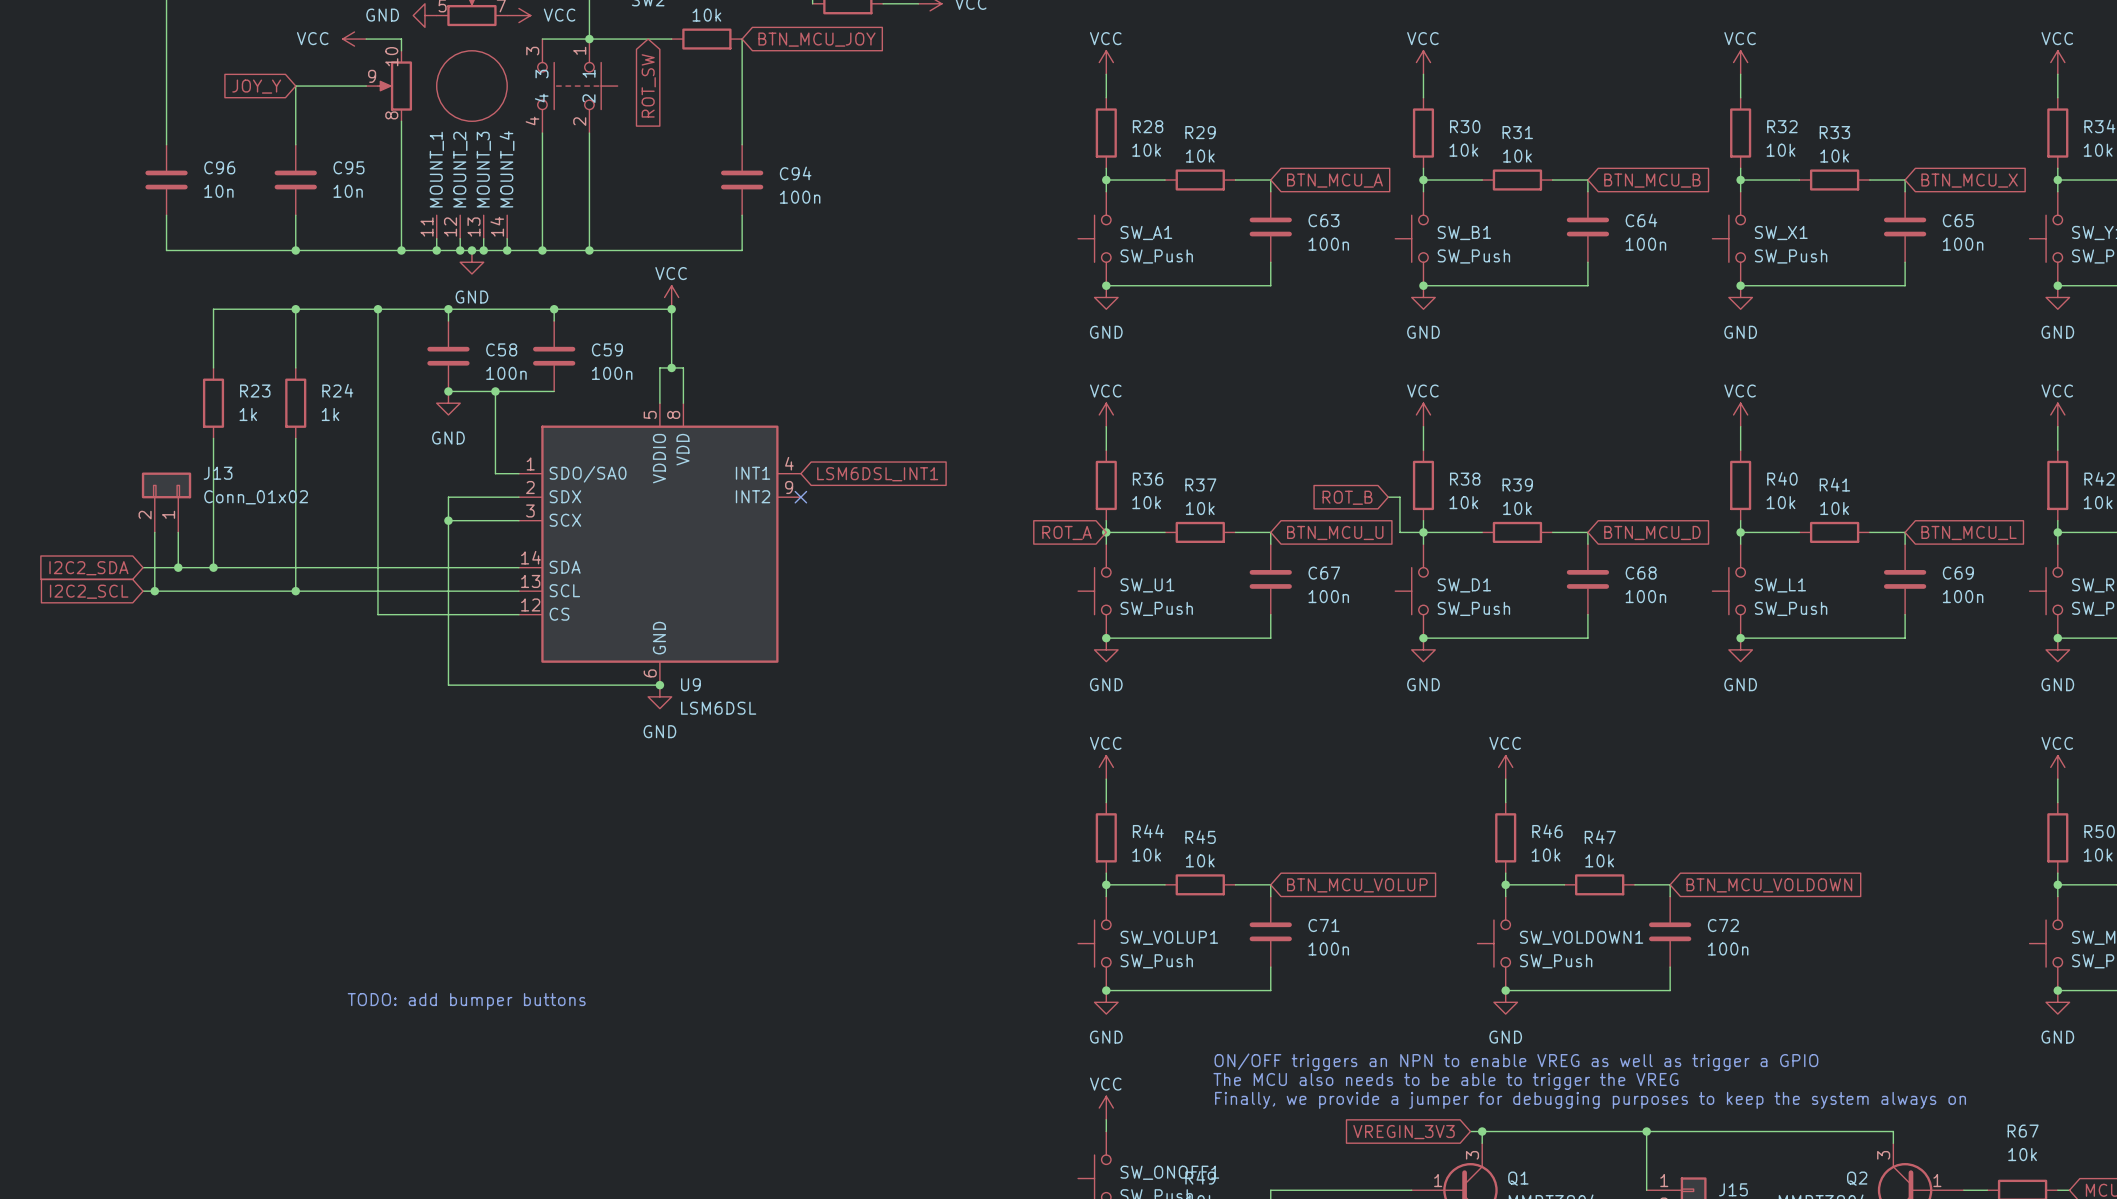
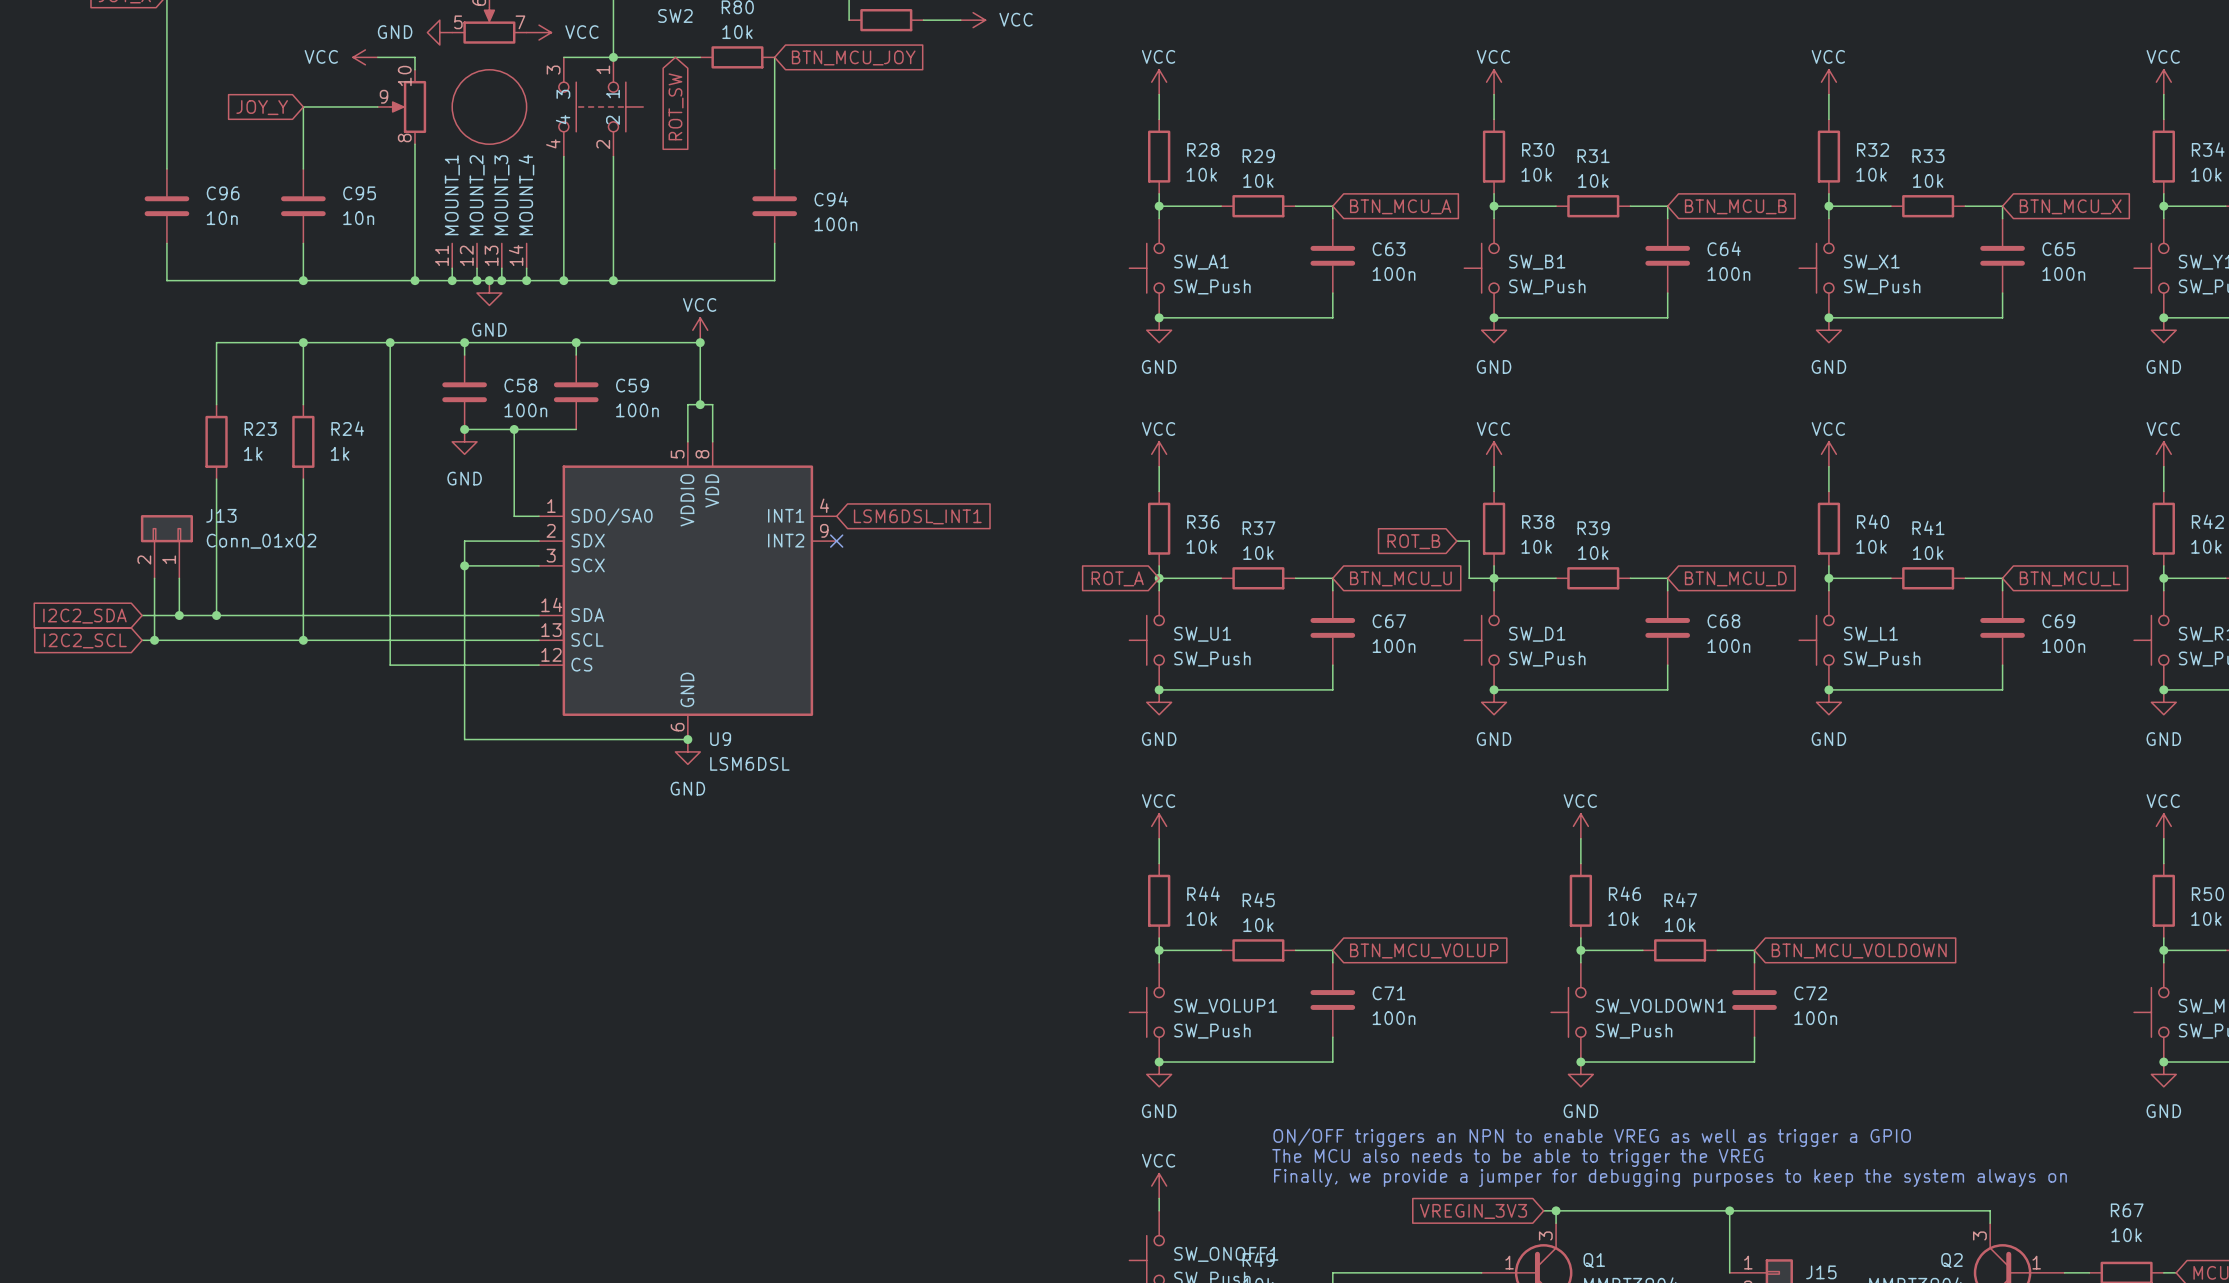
text: TODO: add bumper buttons (466, 1001) -> none

